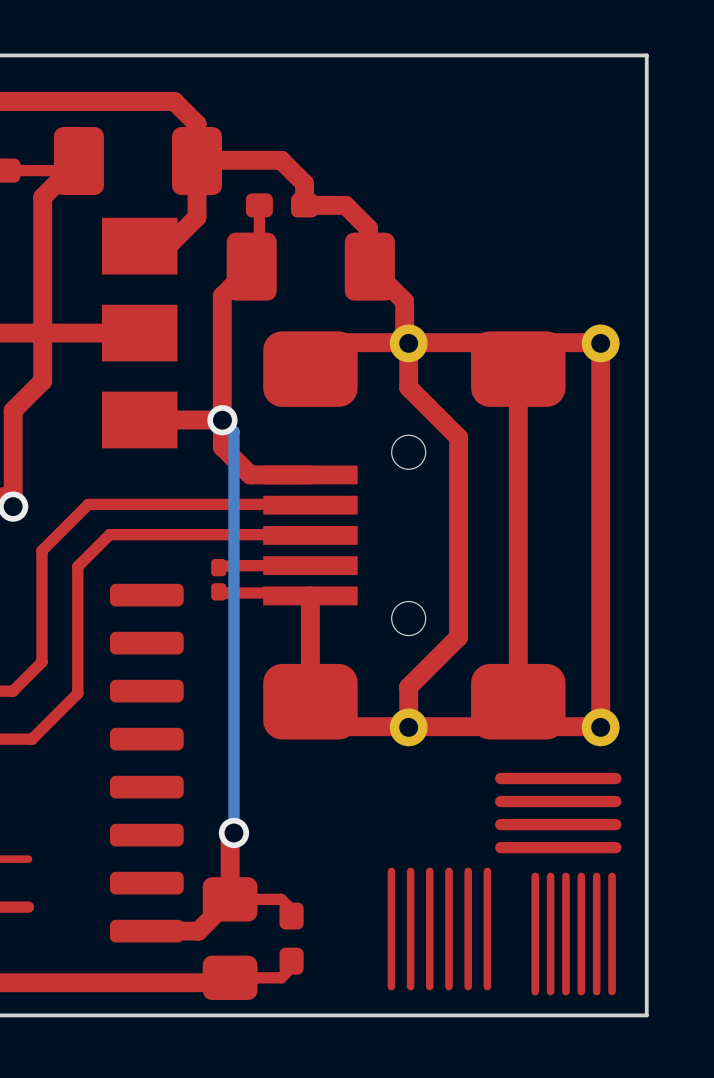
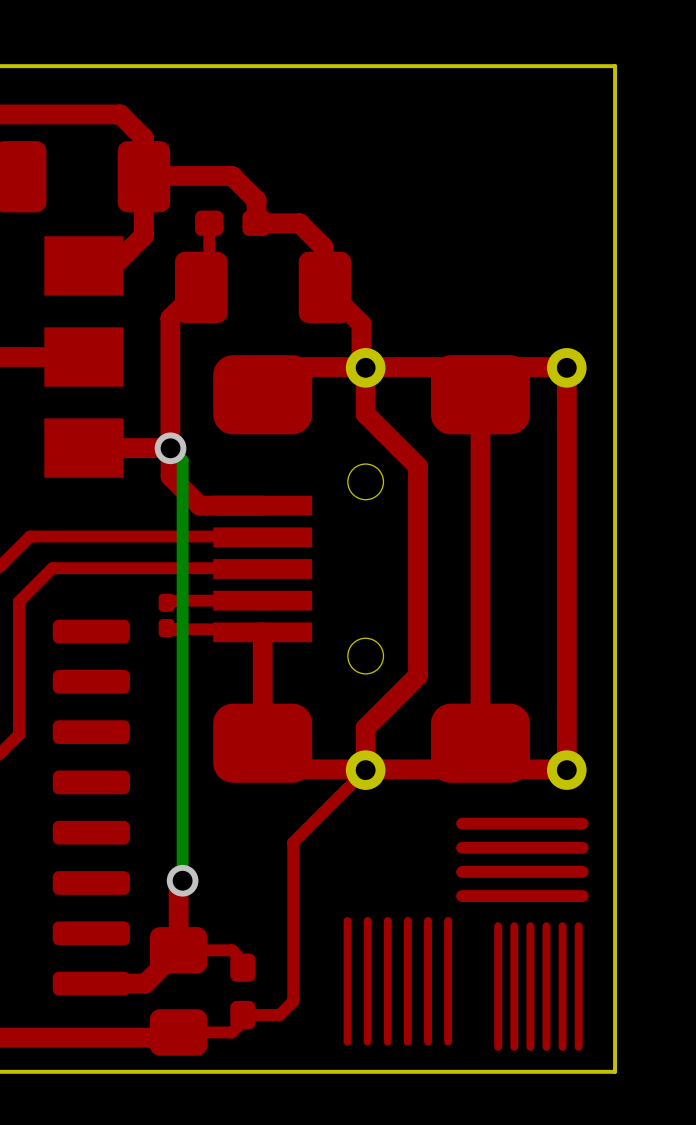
top track: none -> (365, 770) (293, 842) (293, 1001) (279, 1015) (242, 1015)

